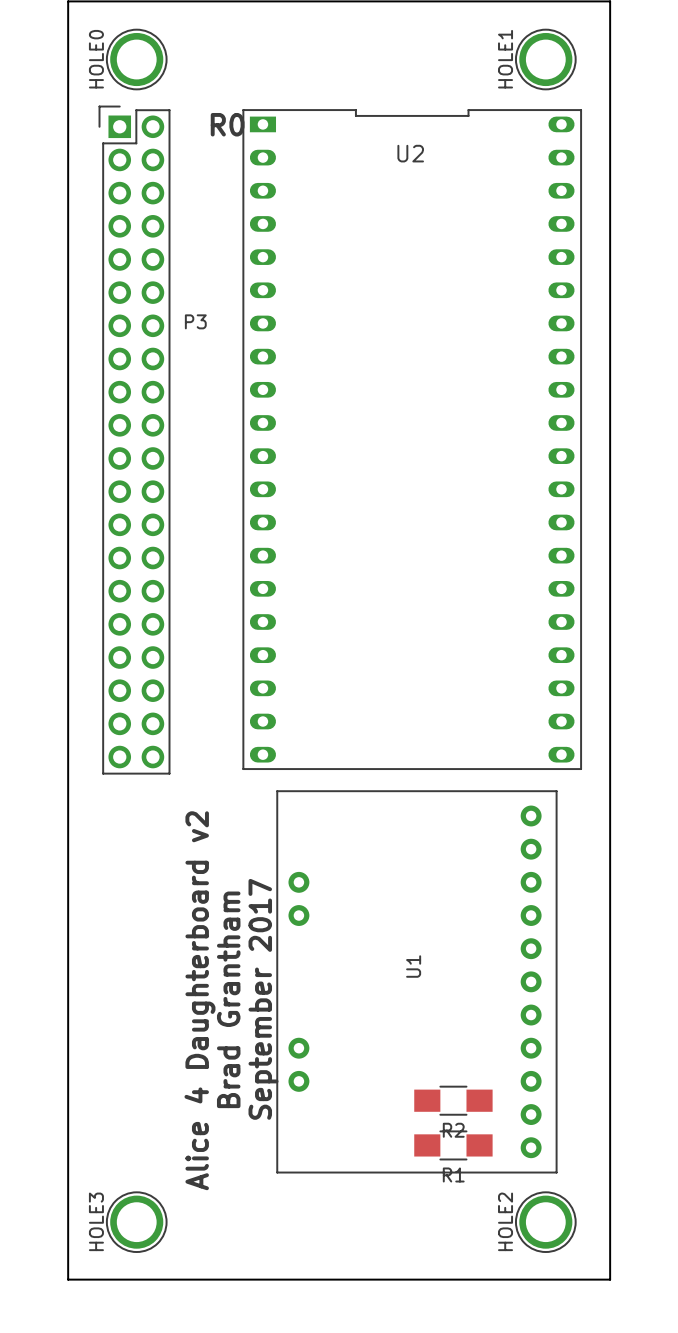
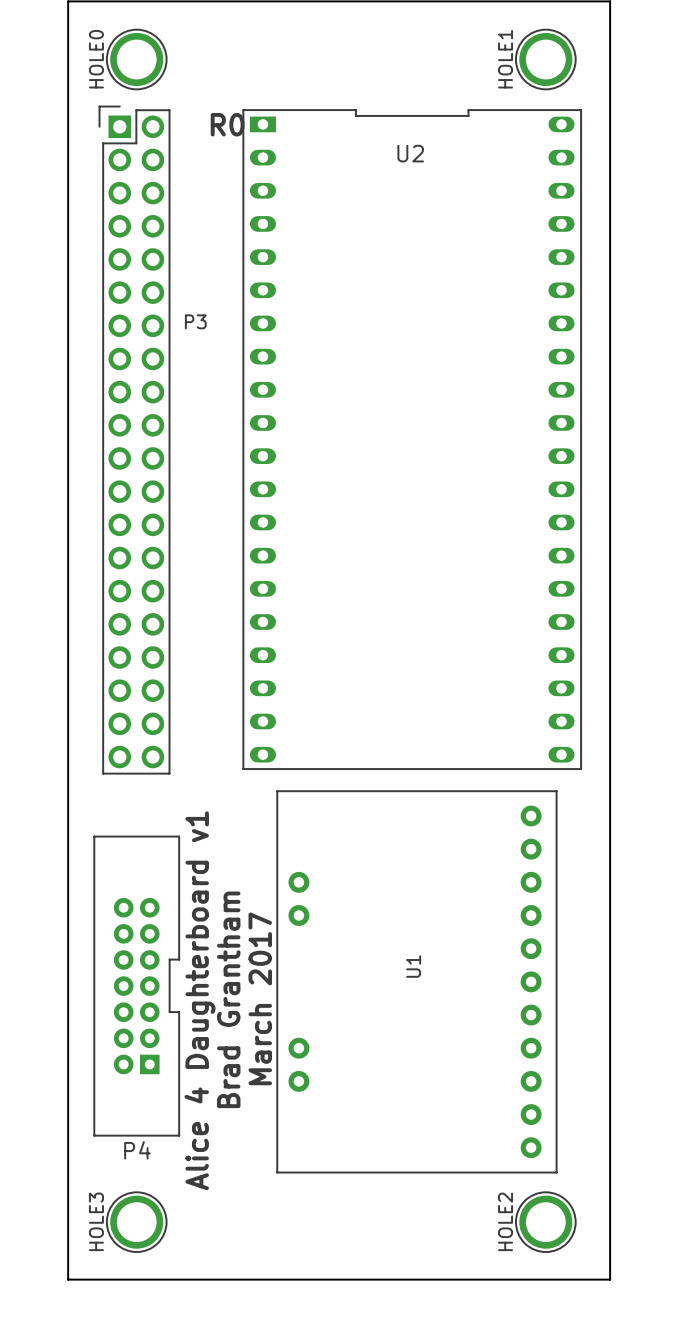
P4: none -> (136, 986)
text: September 2017 (263, 999) -> March 2017 (260, 998)
text: Alice 4 Daughterboard v2 (199, 1000) -> Alice 4 Daughterboard v1 (199, 1000)
R2: (453, 1100) -> none
R1: (453, 1145) -> none

